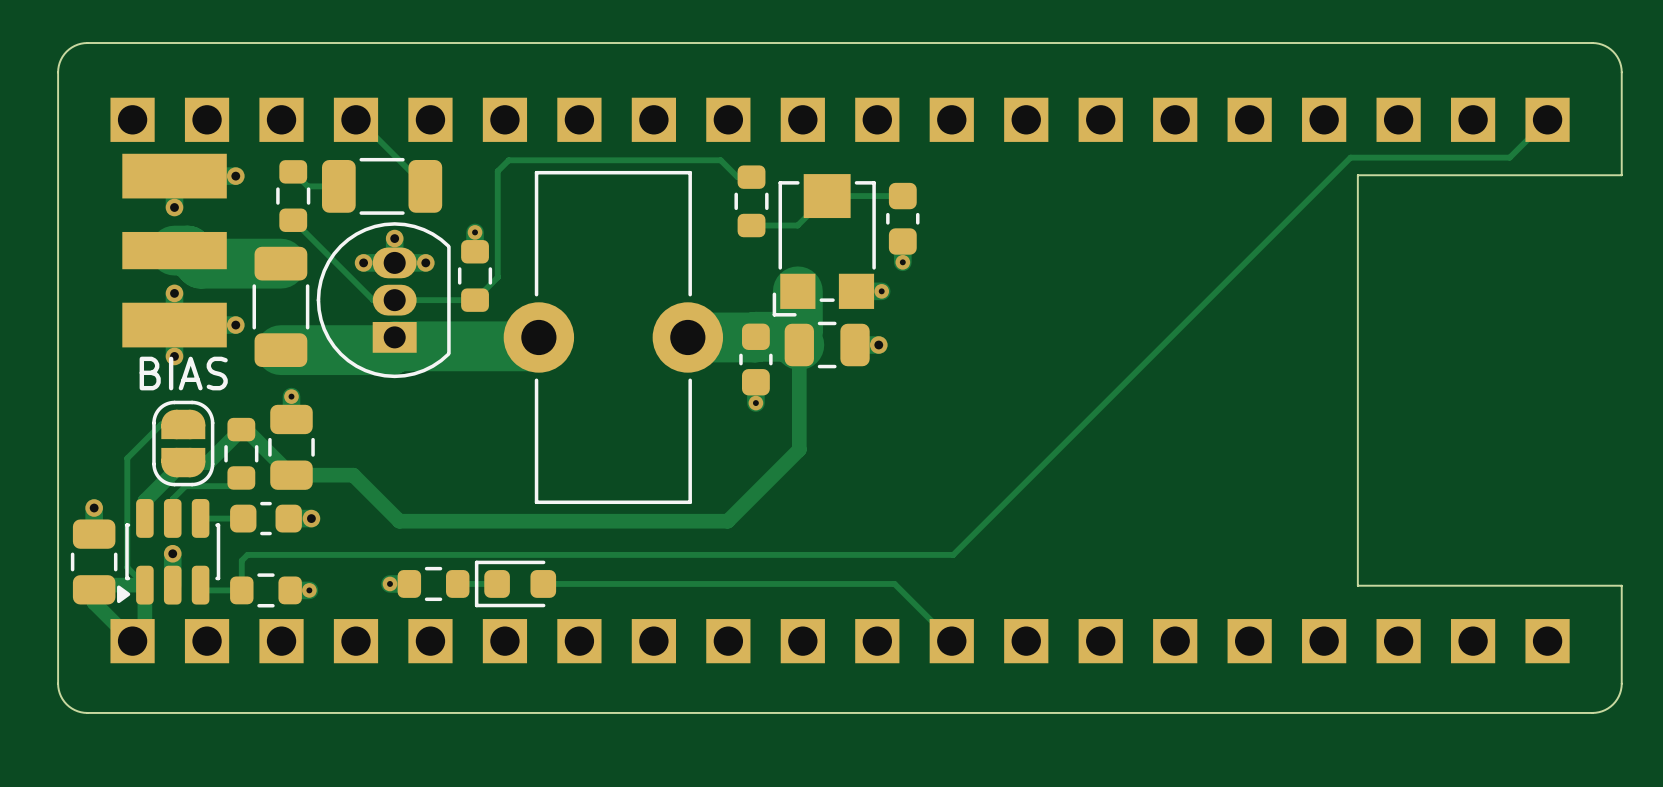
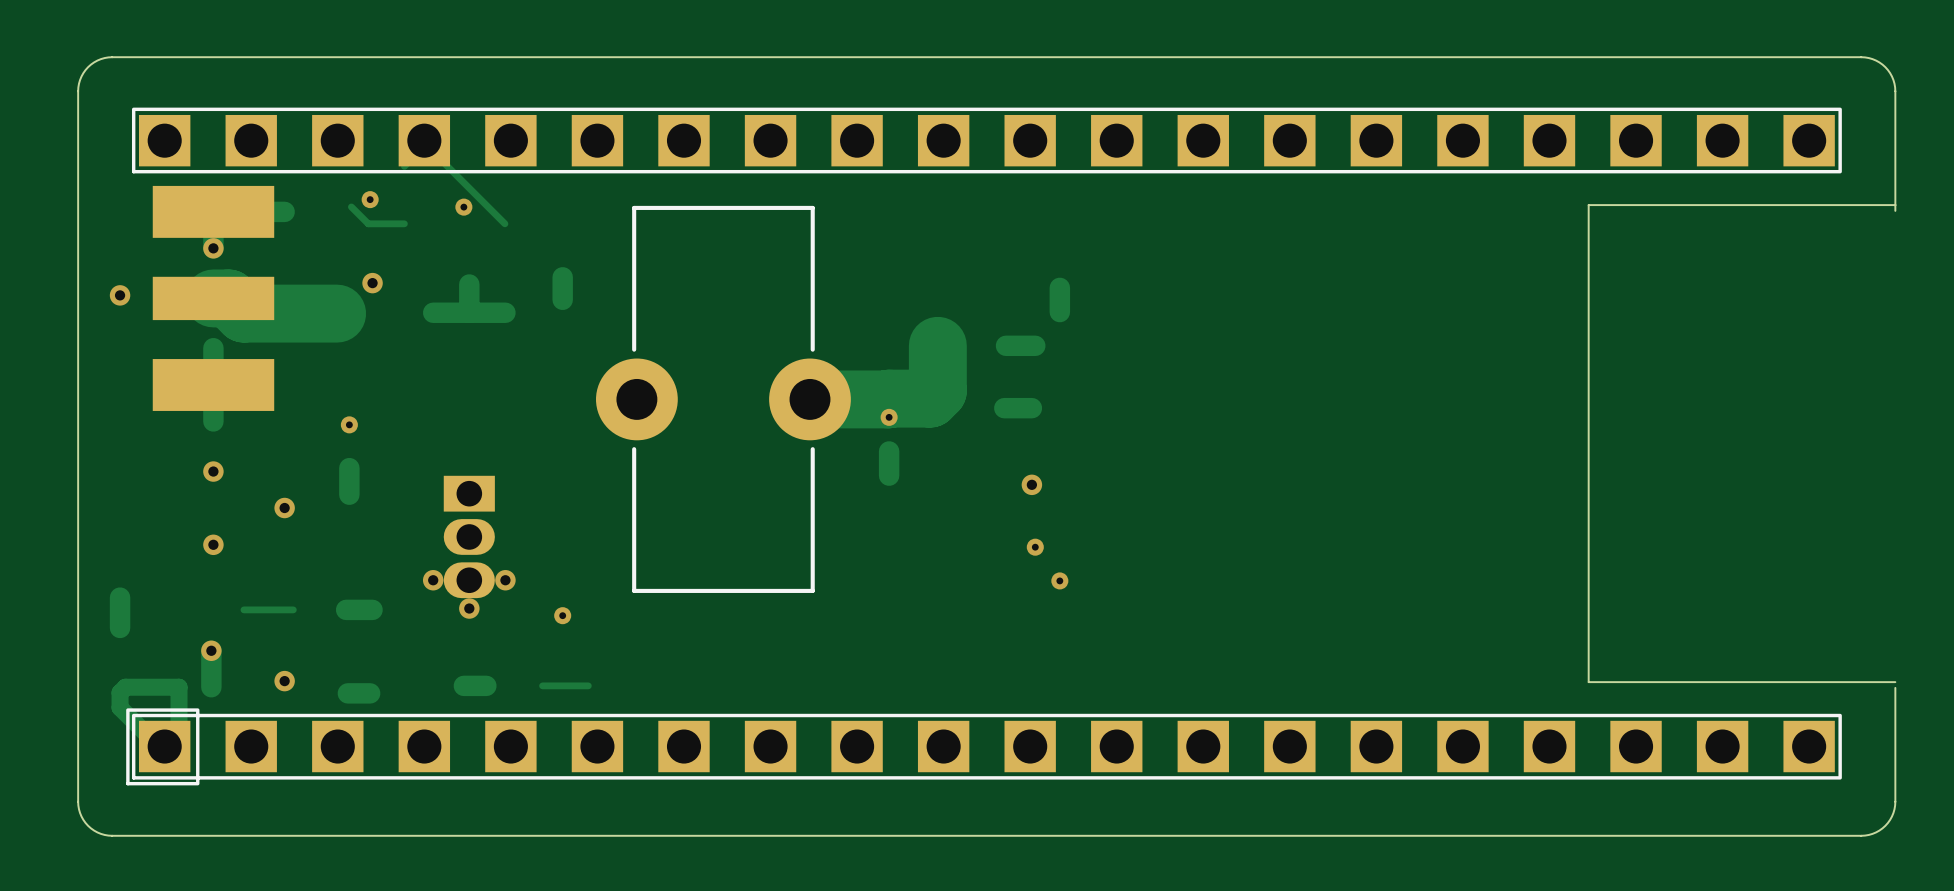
track: (1547, 119) (1509, 157) (1350, 157) (953, 554) (247, 554) (241, 560) (241, 590) (205, 590) (200, 585) -> none
via: none -> (370, 199)
via: none -> (463, 207)
via: (235, 176) -> none
track: (751, 177) (737, 177) (720, 160) (508, 160) (497, 171) (497, 277) -> none
part: (382, 186) -> none
part: (293, 196) -> none
track: (902, 196) (827, 196) (797, 225) (751, 225) -> none
part: (751, 201) -> none
part: (902, 218) -> none
track: (293, 220) (373, 300) (475, 300) (497, 277) -> none
via: (475, 232) -> none
via: none -> (372, 283)
via: (394, 238) -> none
part: (824, 245) -> none
via: none -> (120, 295)
via: (363, 262) -> none
via: (425, 262) -> none
via: (902, 262) -> none
part: (475, 275) -> none
via: (881, 291) -> none
via: (174, 293) -> none
part side: top (383, 300) -> bottom (469, 536)
part: (280, 306) -> none
via: (235, 325) -> none
track: (791, 336) (799, 345) (799, 449) (727, 521) (399, 521) (353, 475) (291, 475) (245, 429) (241, 429) (208, 462) (183, 462) (144, 500) (144, 518) -> none
track: (538, 337) (530, 346) (394, 346) (390, 350) (280, 350) -> none
part: (827, 345) -> none
via position: (878, 345) -> (1031, 484)
via position: (174, 356) -> (213, 471)
part: (755, 359) -> none
part side: bottom (866, 380) -> top (1011, 446)
via position: (291, 396) -> (349, 424)
via position: (755, 403) -> (889, 417)
track: (183, 424) (161, 424) (127, 458) (127, 567) (144, 585) -> none
via: none -> (284, 508)
part: BIAS (183, 443) -> none
part: (291, 447) -> none
part: (241, 453) -> none
via: none -> (213, 544)
via: none -> (1035, 547)
track: (241, 477) (233, 486) (185, 486) (172, 499) (172, 518) -> none
via: none -> (433, 580)
via: none -> (505, 580)
via: none -> (1059, 580)
via: (94, 508) -> none
via: none -> (469, 608)
part: (265, 518) -> none
via: (311, 518) -> none
via: none -> (562, 615)
part: (168, 551) -> none
part: (94, 561) -> none
via: none -> (284, 681)
via: (390, 583) -> none
part: (433, 583) -> none
part: (515, 583) -> none
track: (543, 583) (894, 583) (951, 641) -> none
part: (265, 590) -> none
via: (309, 590) -> none

